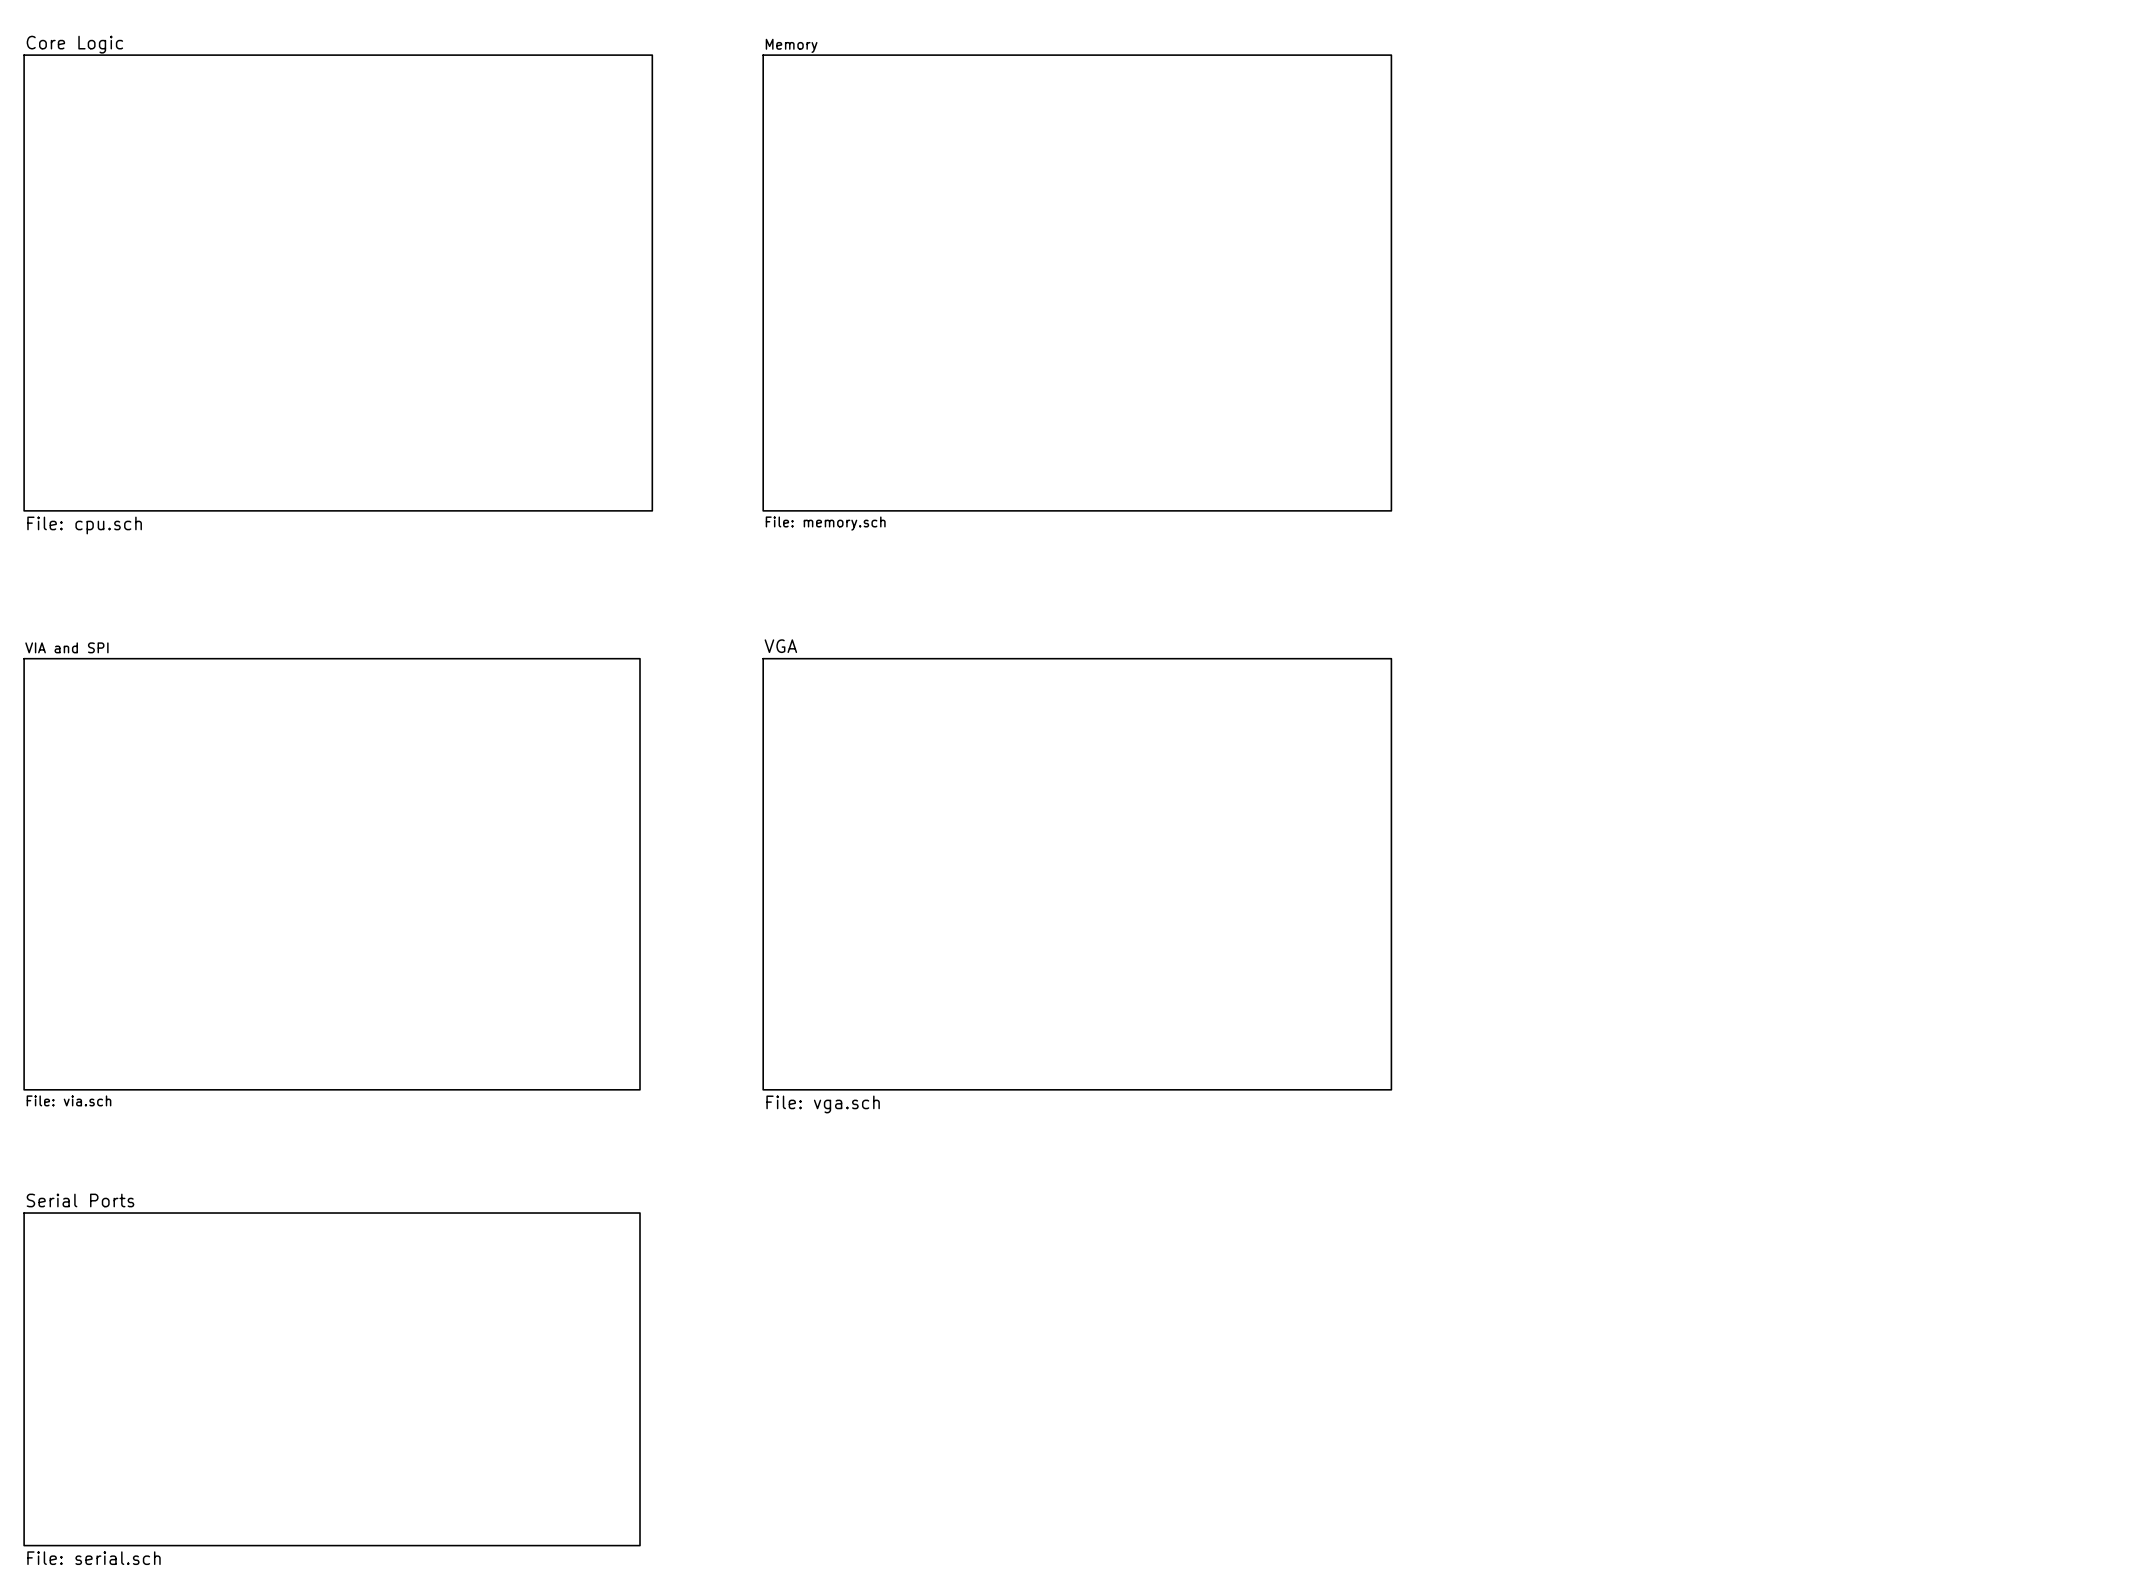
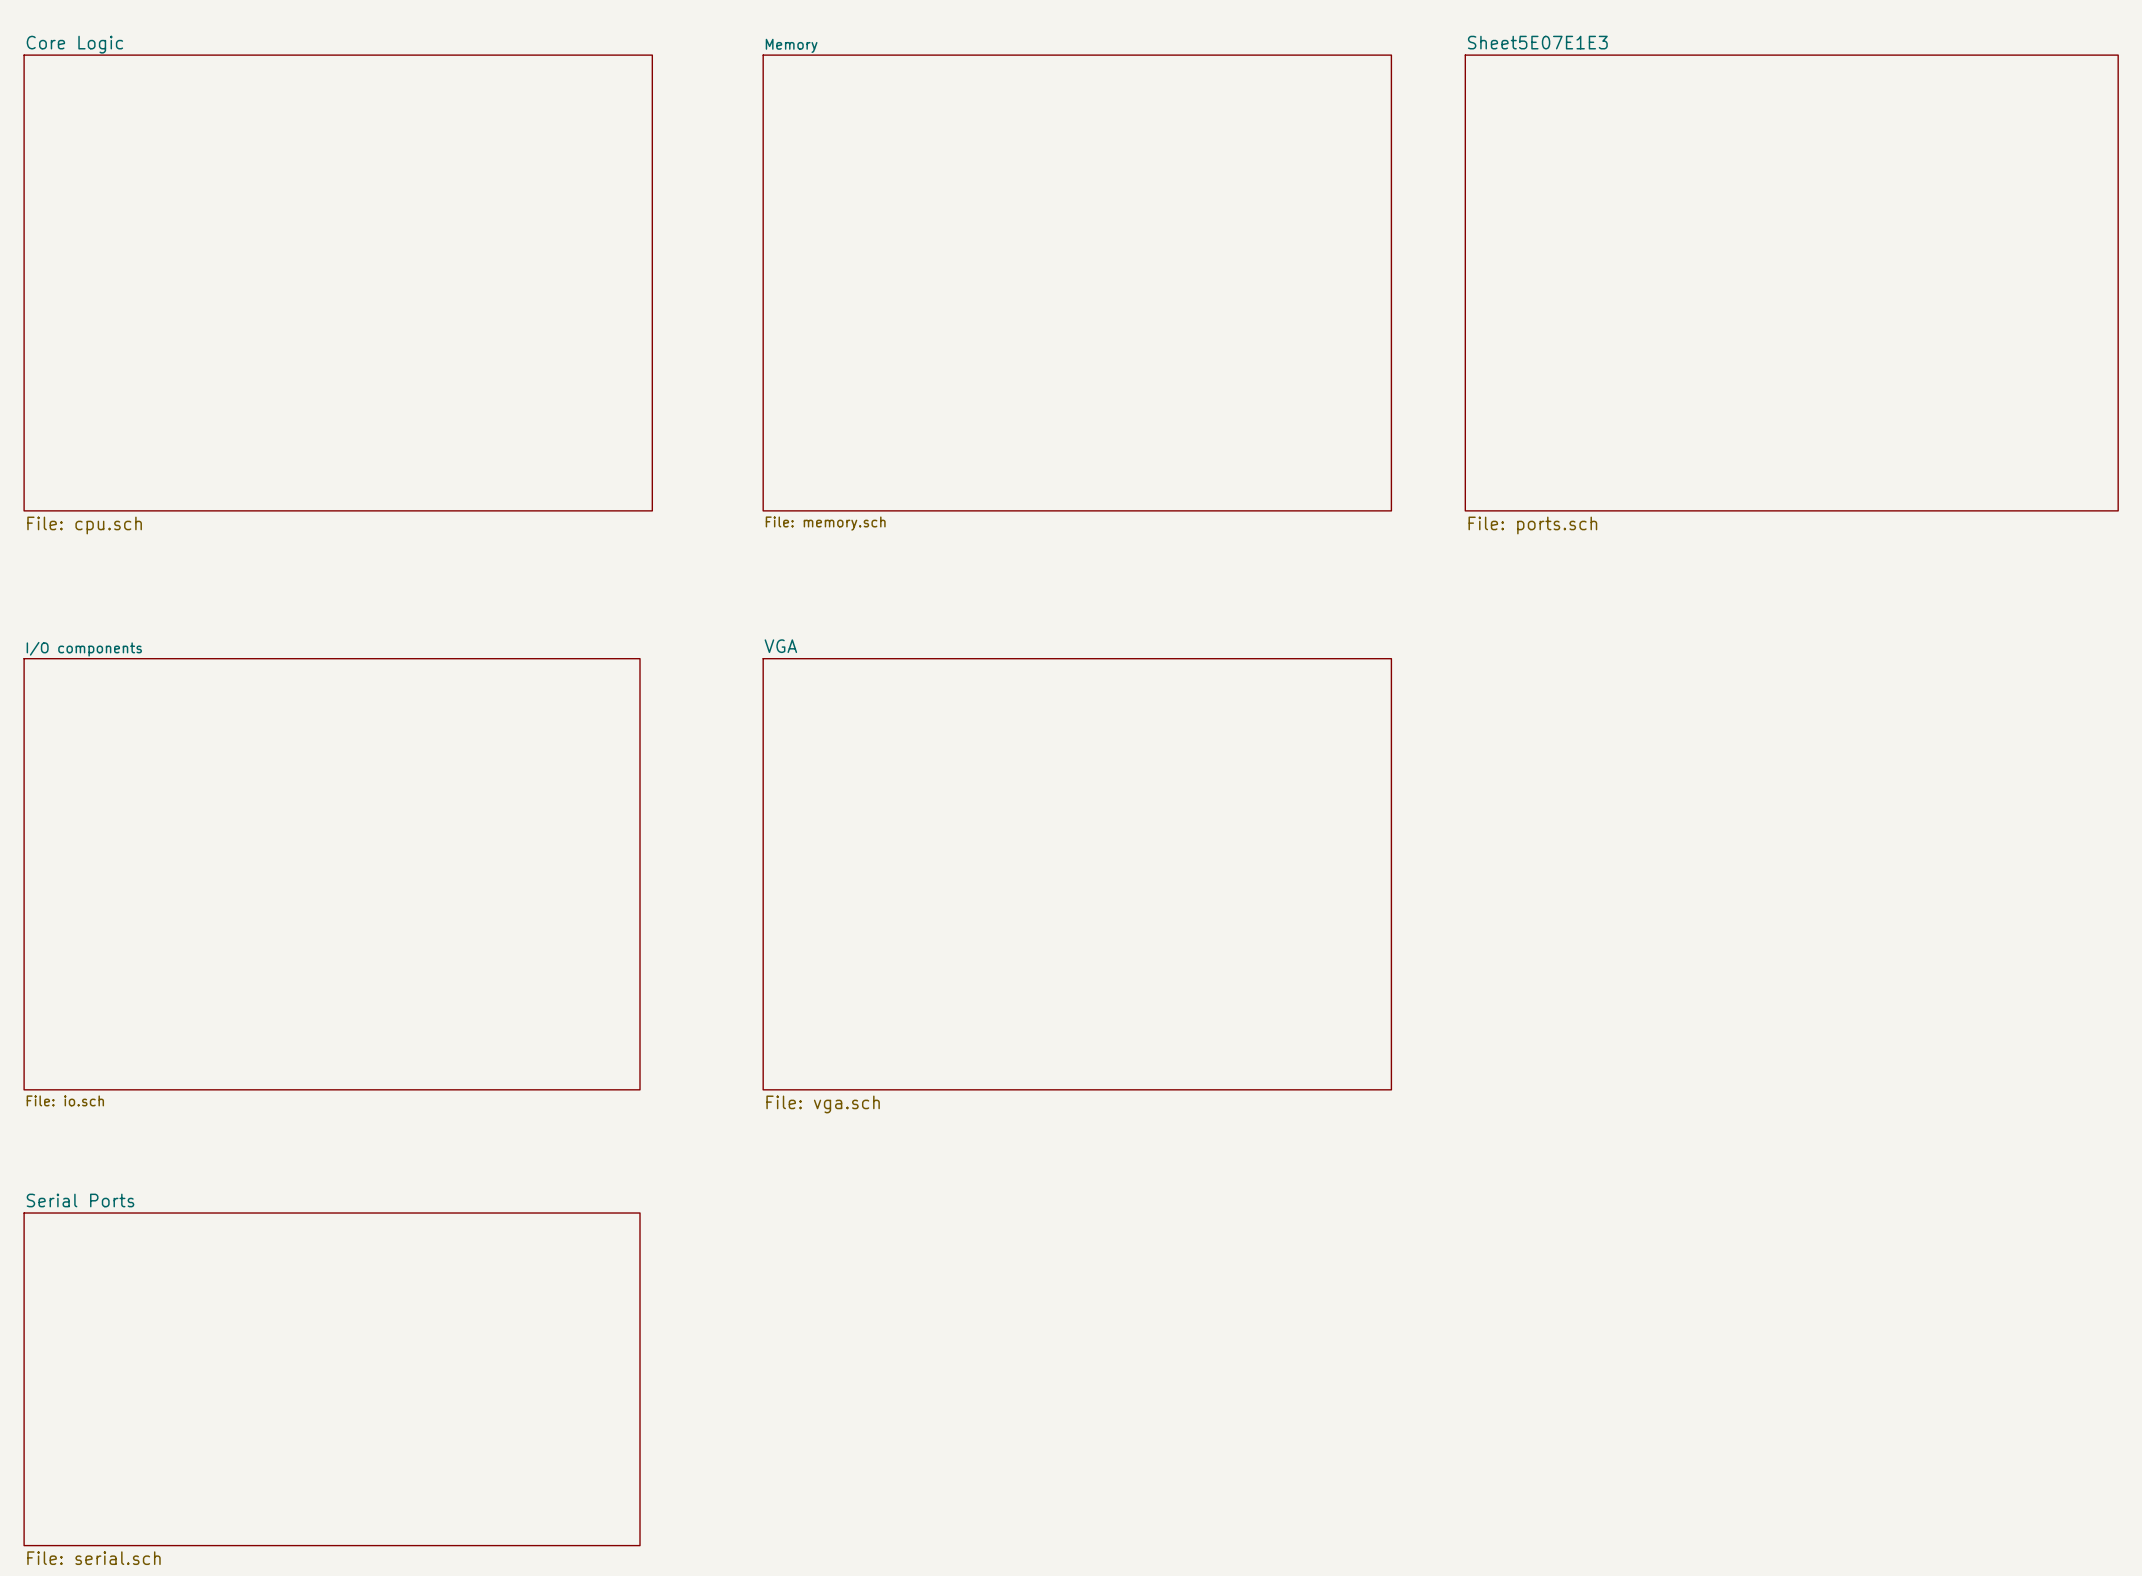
sheet Sheet5E07E1E3: none -> File: ports.sch (1791, 282)
sheet VIA and SPI name: VIA and SPI (66, 647) -> I/O components (84, 649)
sheet VIA and SPI value: File: via.sch (68, 1100) -> File: io.sch (65, 1100)

